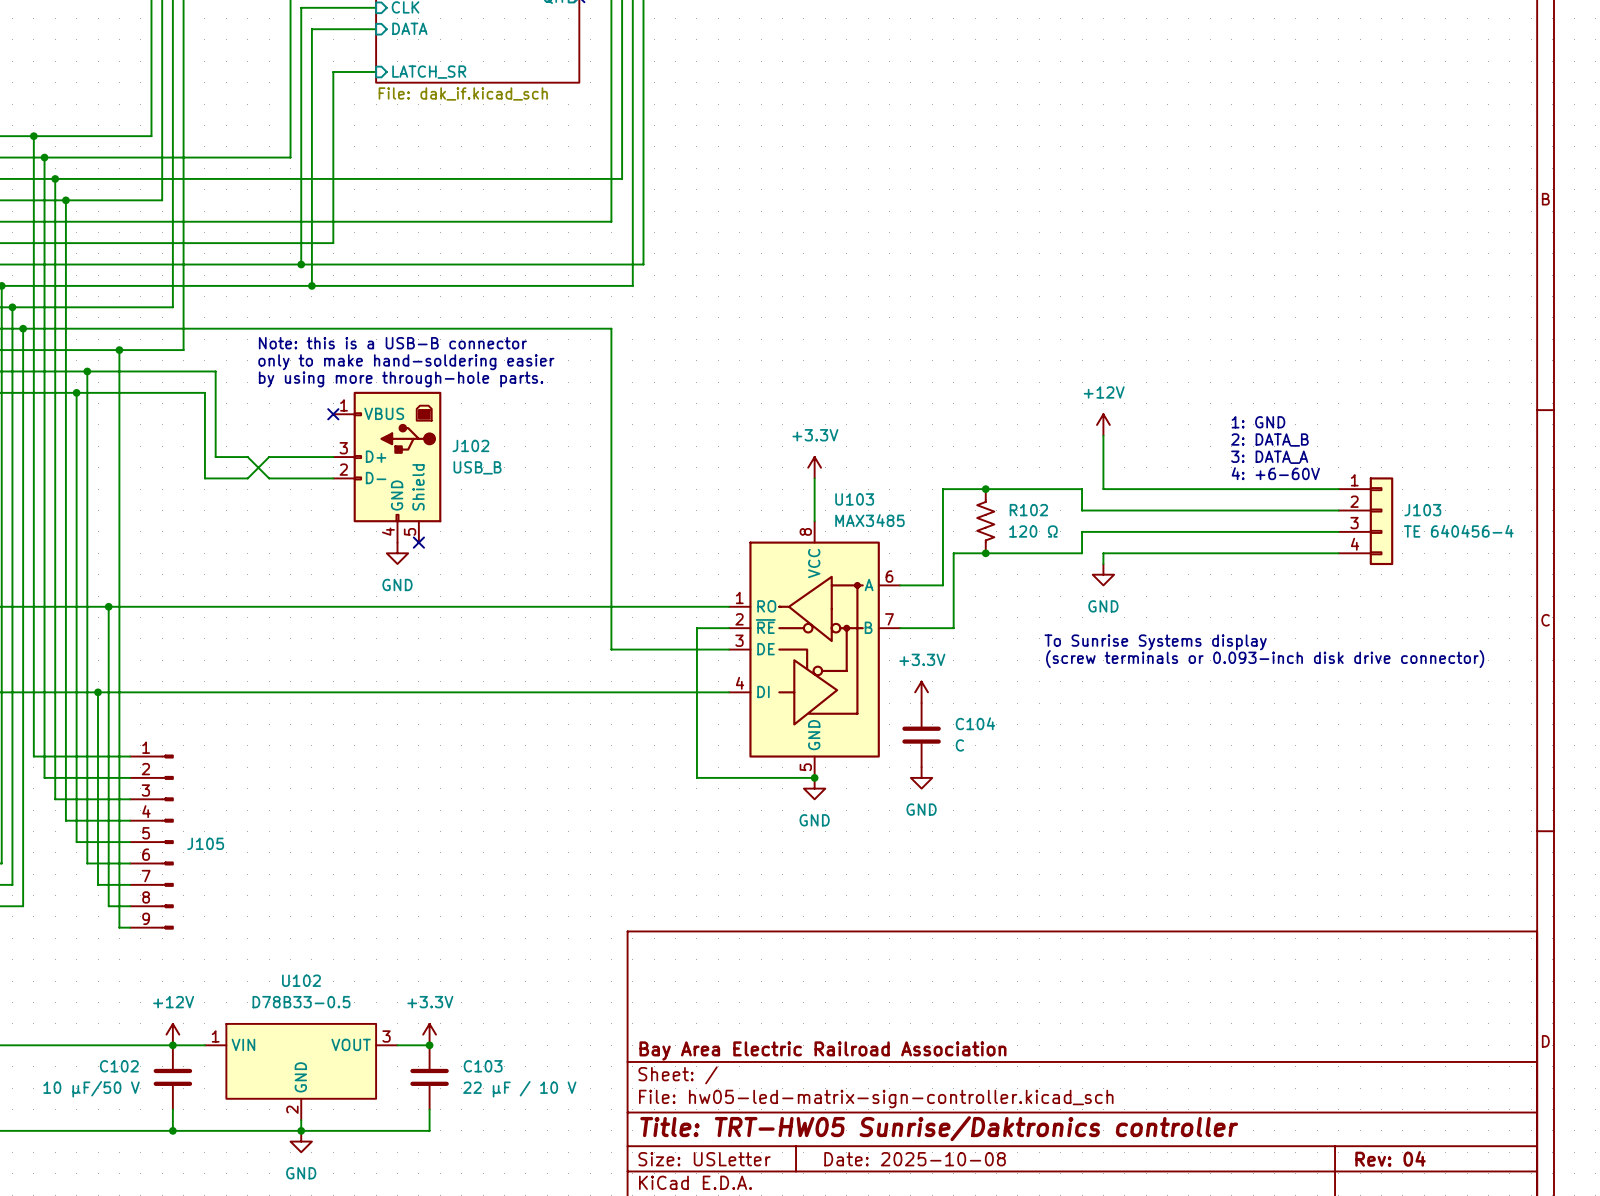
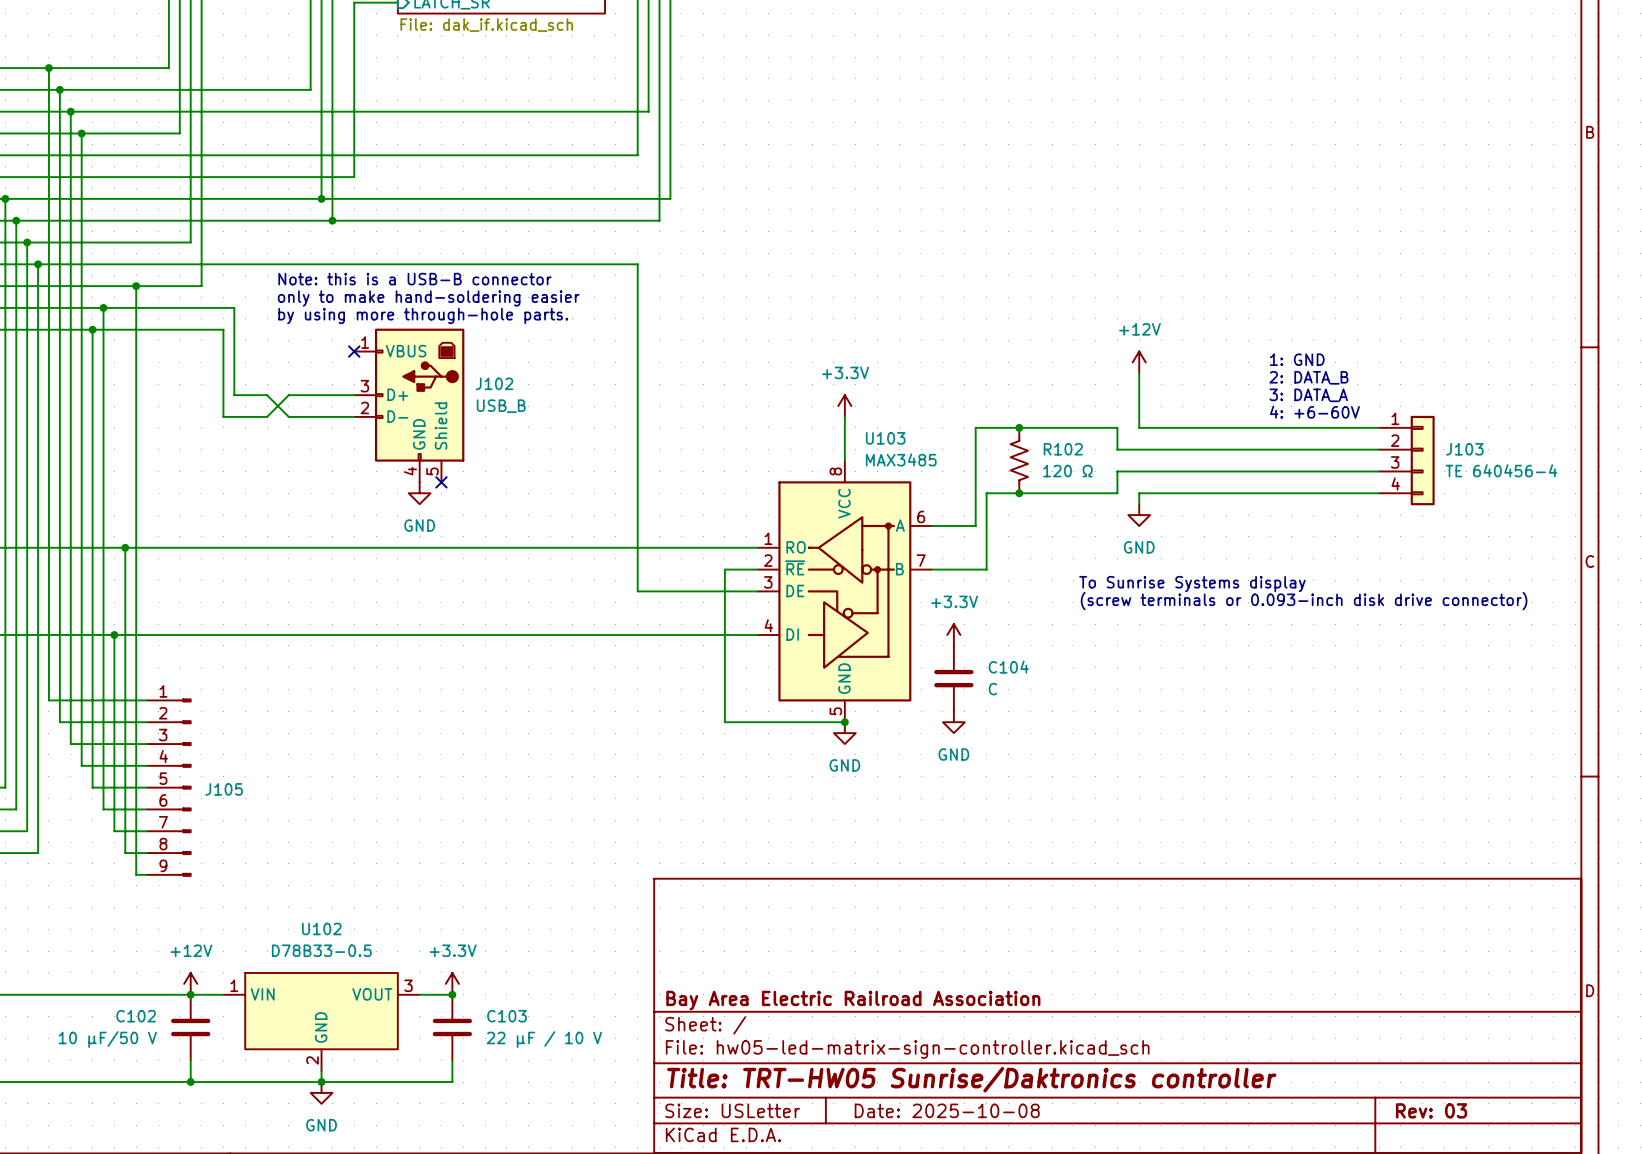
title block: Rev: 04 (1390, 1158) -> Rev: 03 (1431, 1110)

